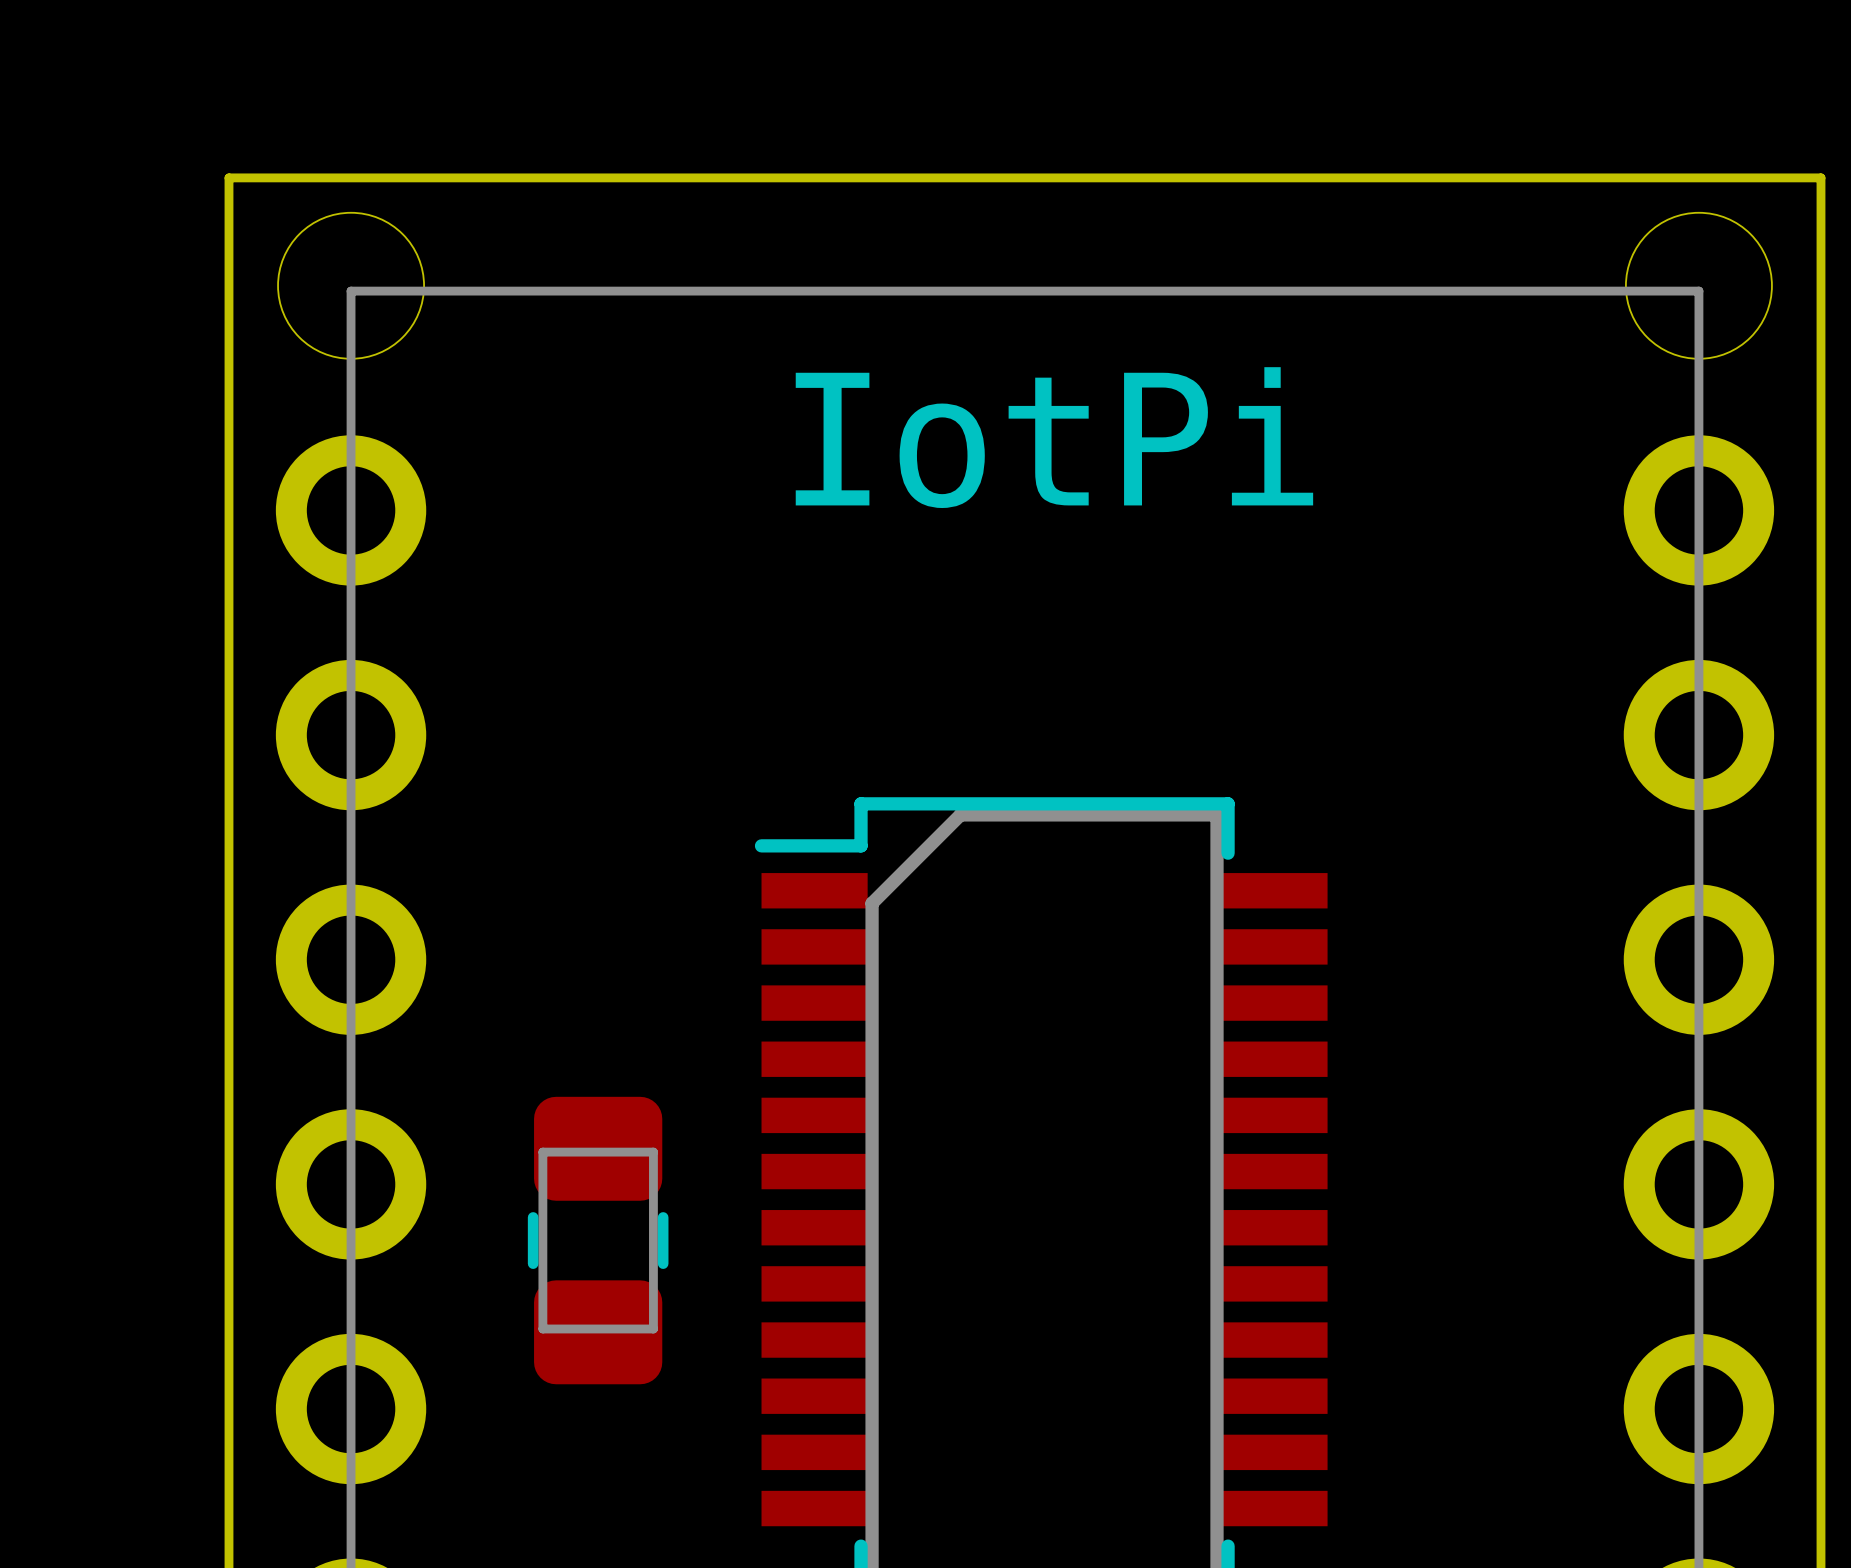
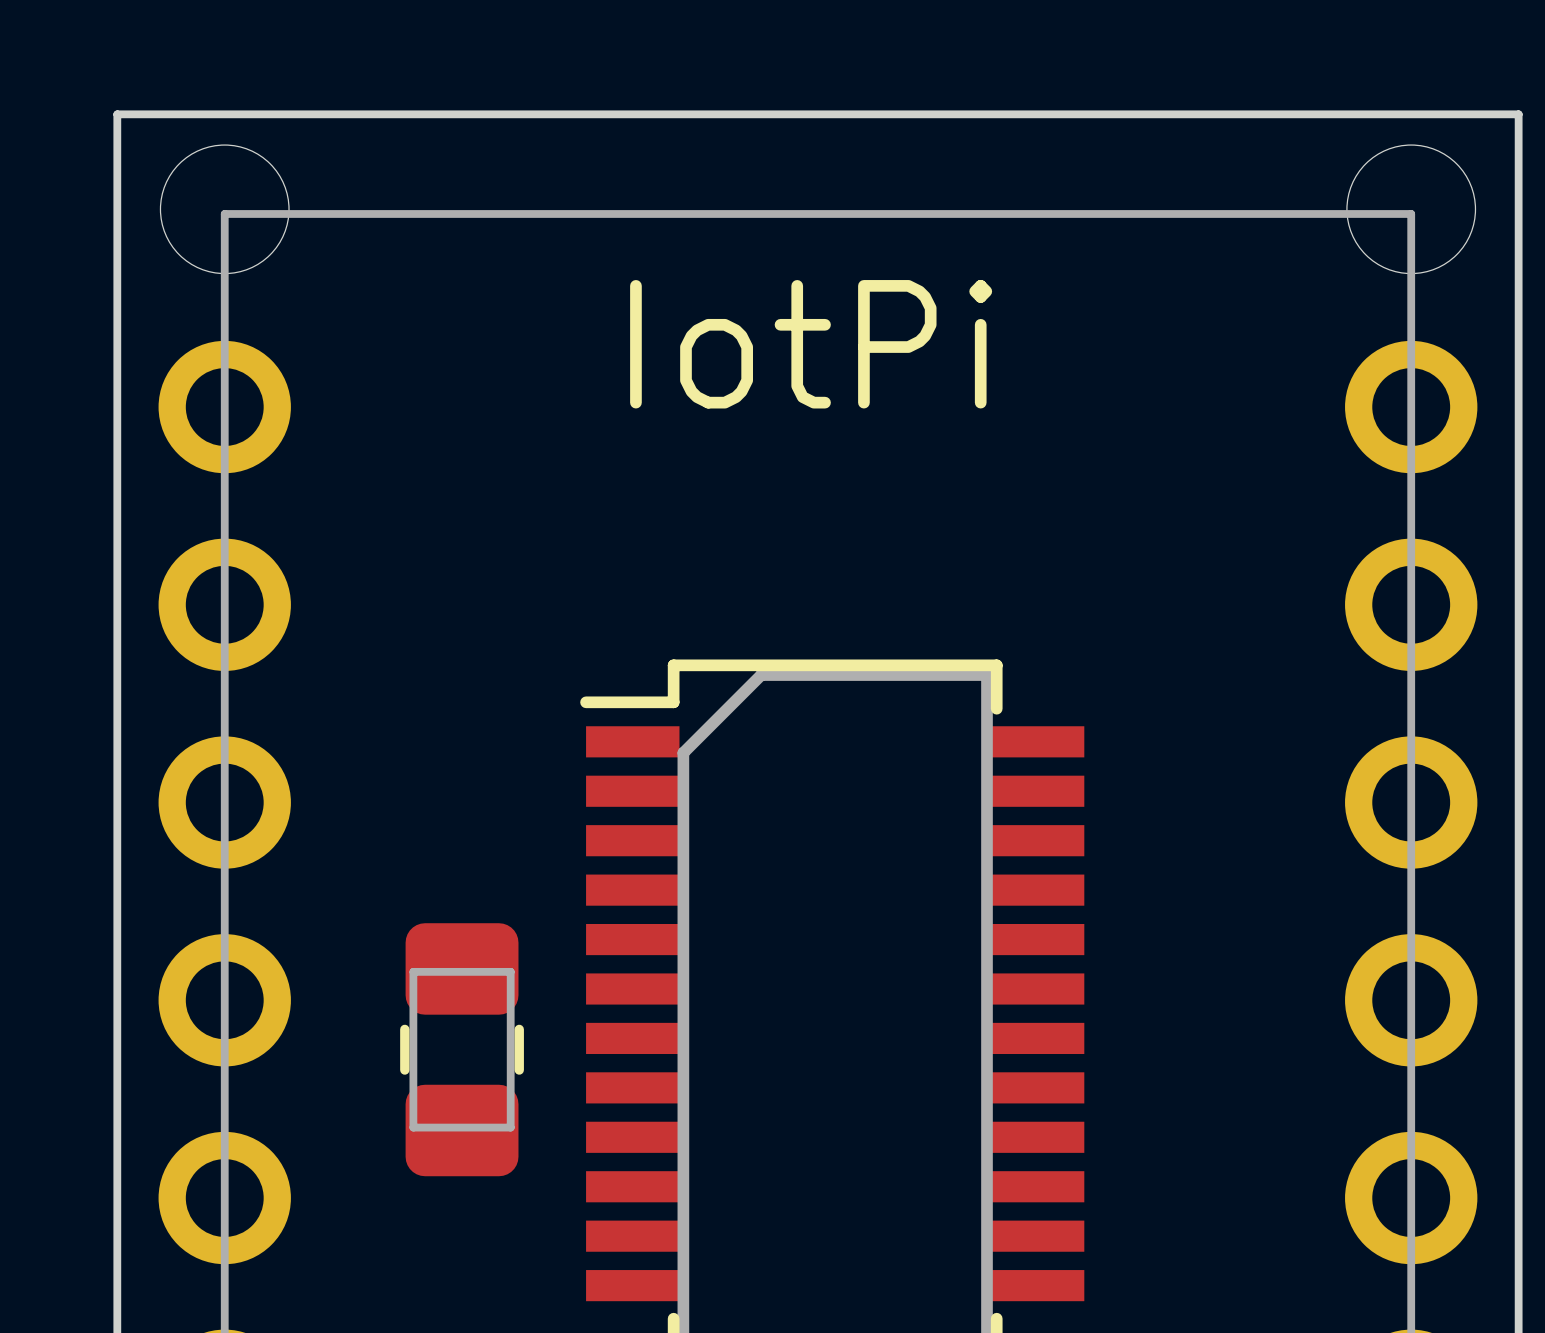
part position: (598, 1240) -> (462, 1049)

